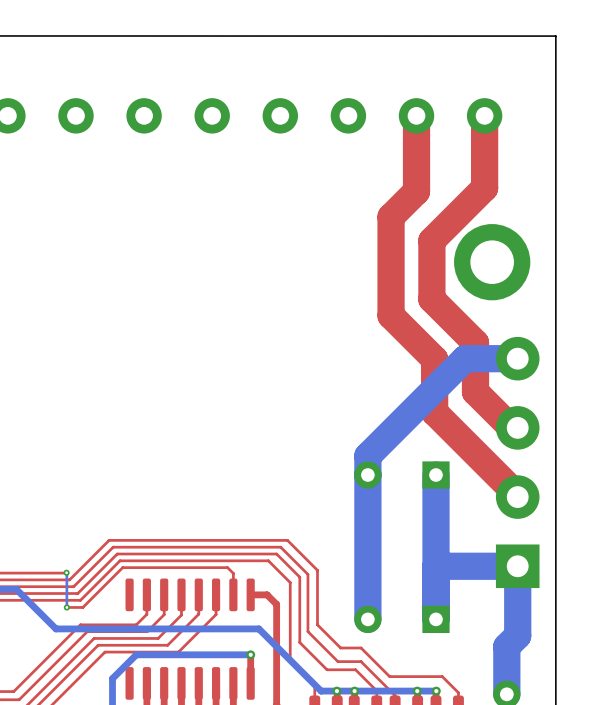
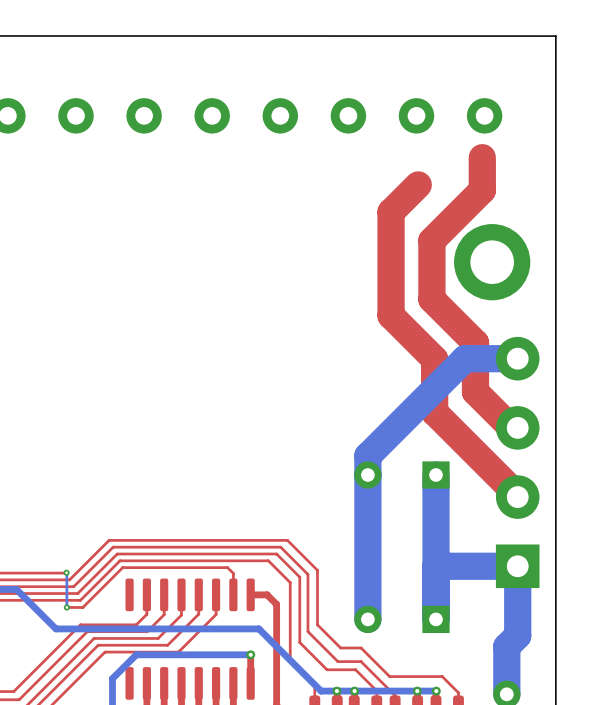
top track: (416, 115) (416, 191) (391, 216) -> (418, 184) (391, 212) (391, 216)
top track: (484, 115) (484, 188) (482, 190) -> (482, 157) (482, 190)

